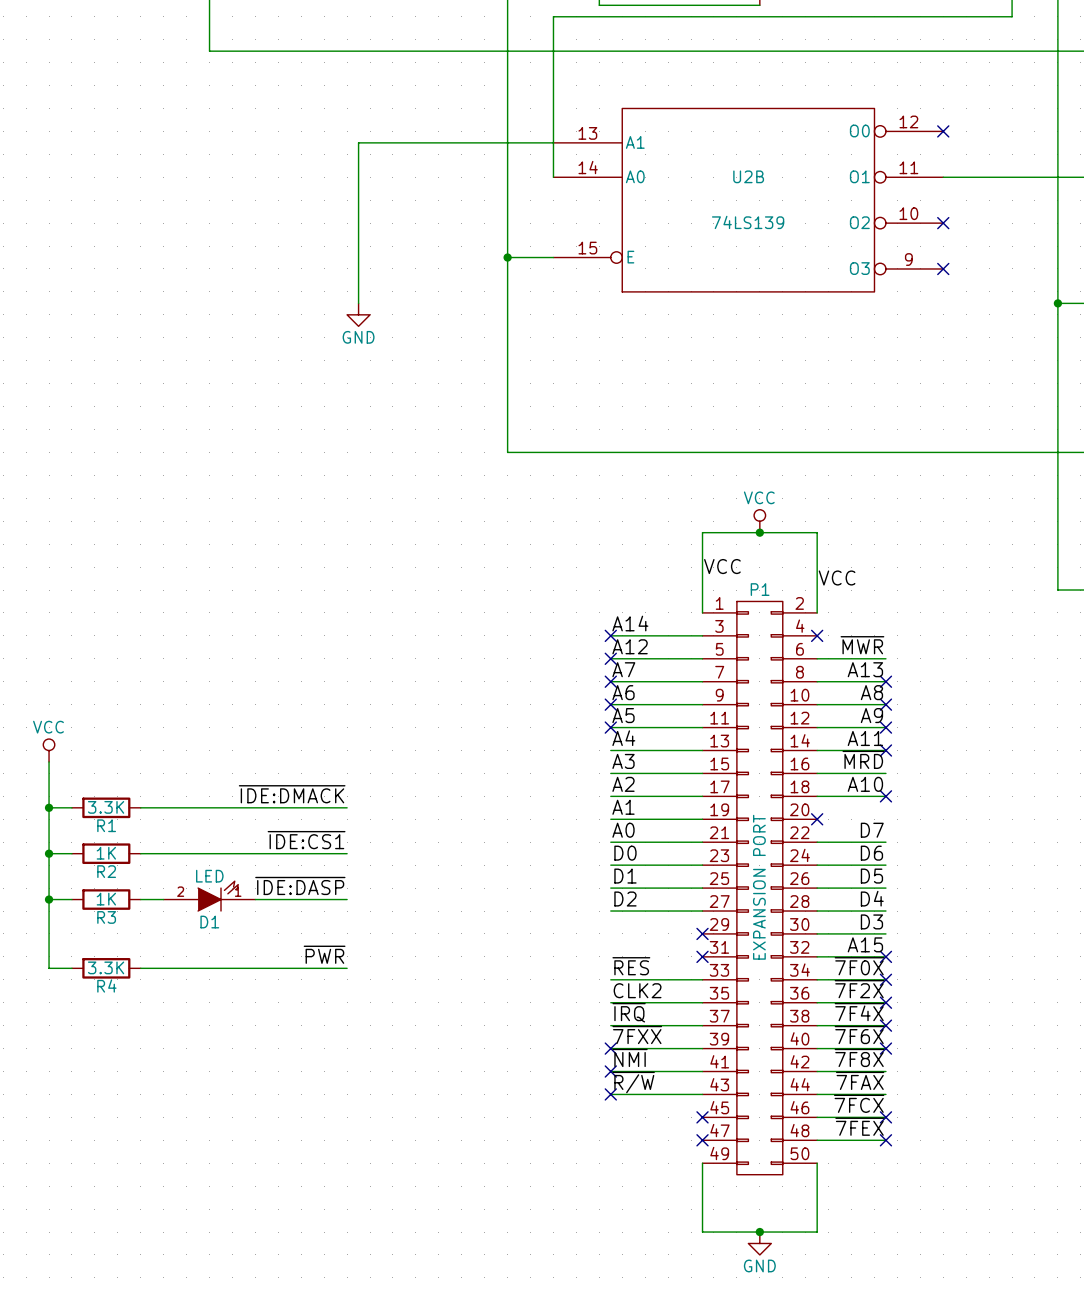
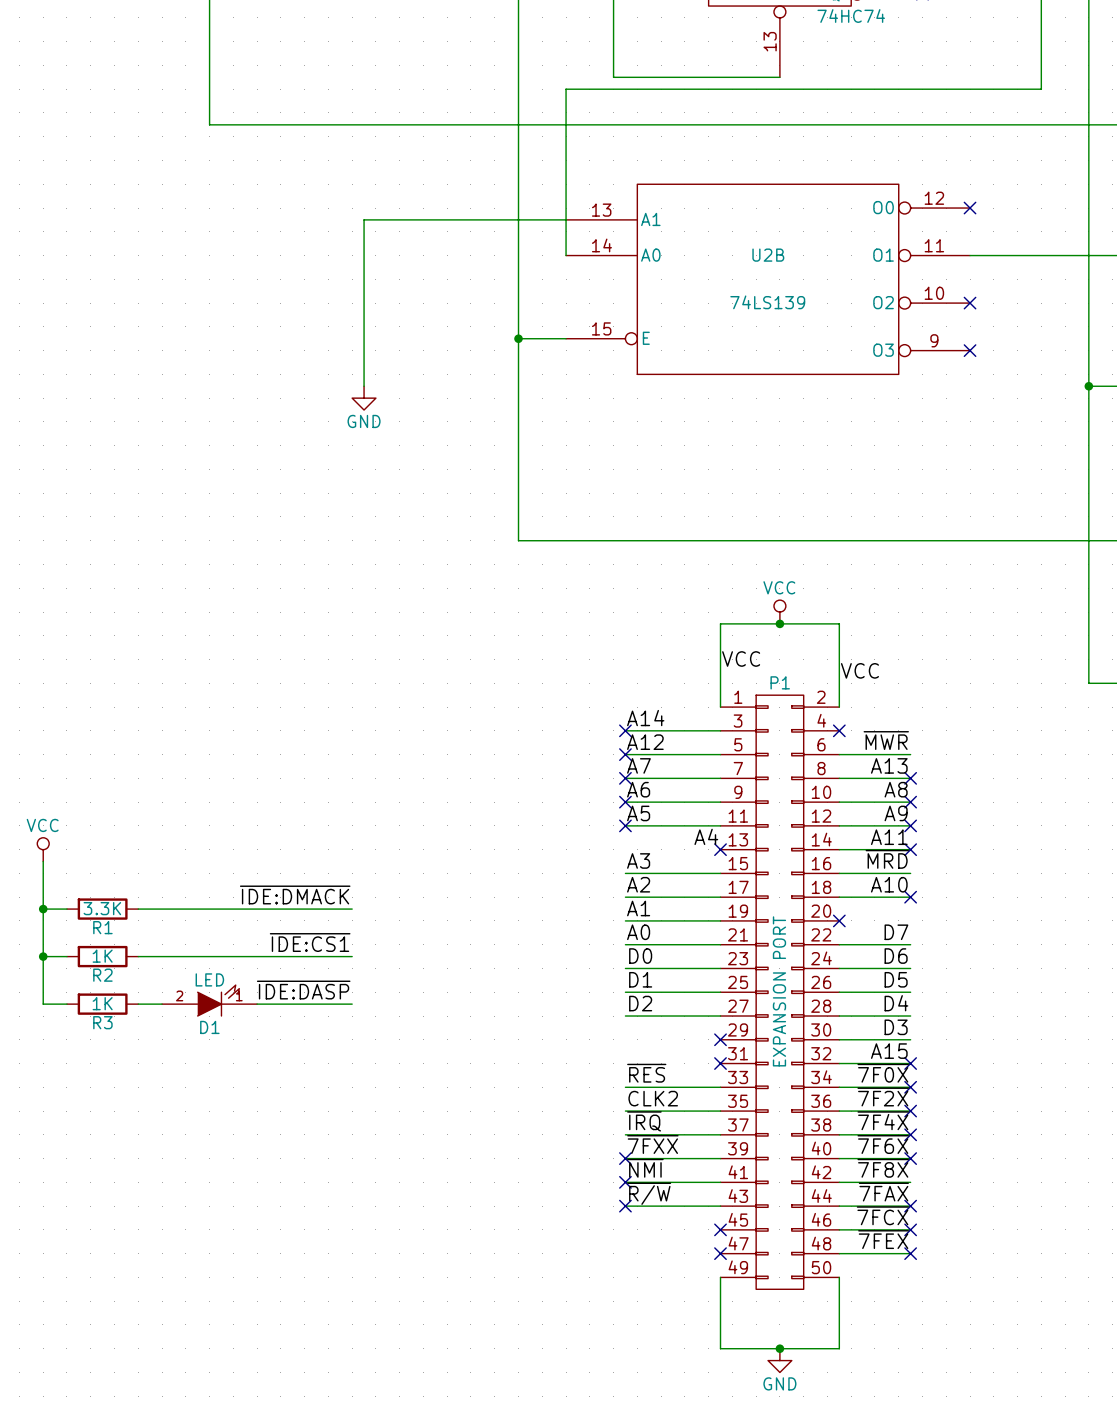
label position: A4 (623, 738) -> A4 (706, 836)
wire: (610, 750) (702, 750) -> none
no-connect mark: none -> (720, 849)
wire: (49, 899) (49, 968) (71, 968) -> none
junction: (49, 899) -> none
label: ~{PWR} (324, 954) -> none
R4: 3.3K (106, 968) -> none
wire: (140, 968) (347, 968) -> none
no-connect mark: none -> (910, 1206)

